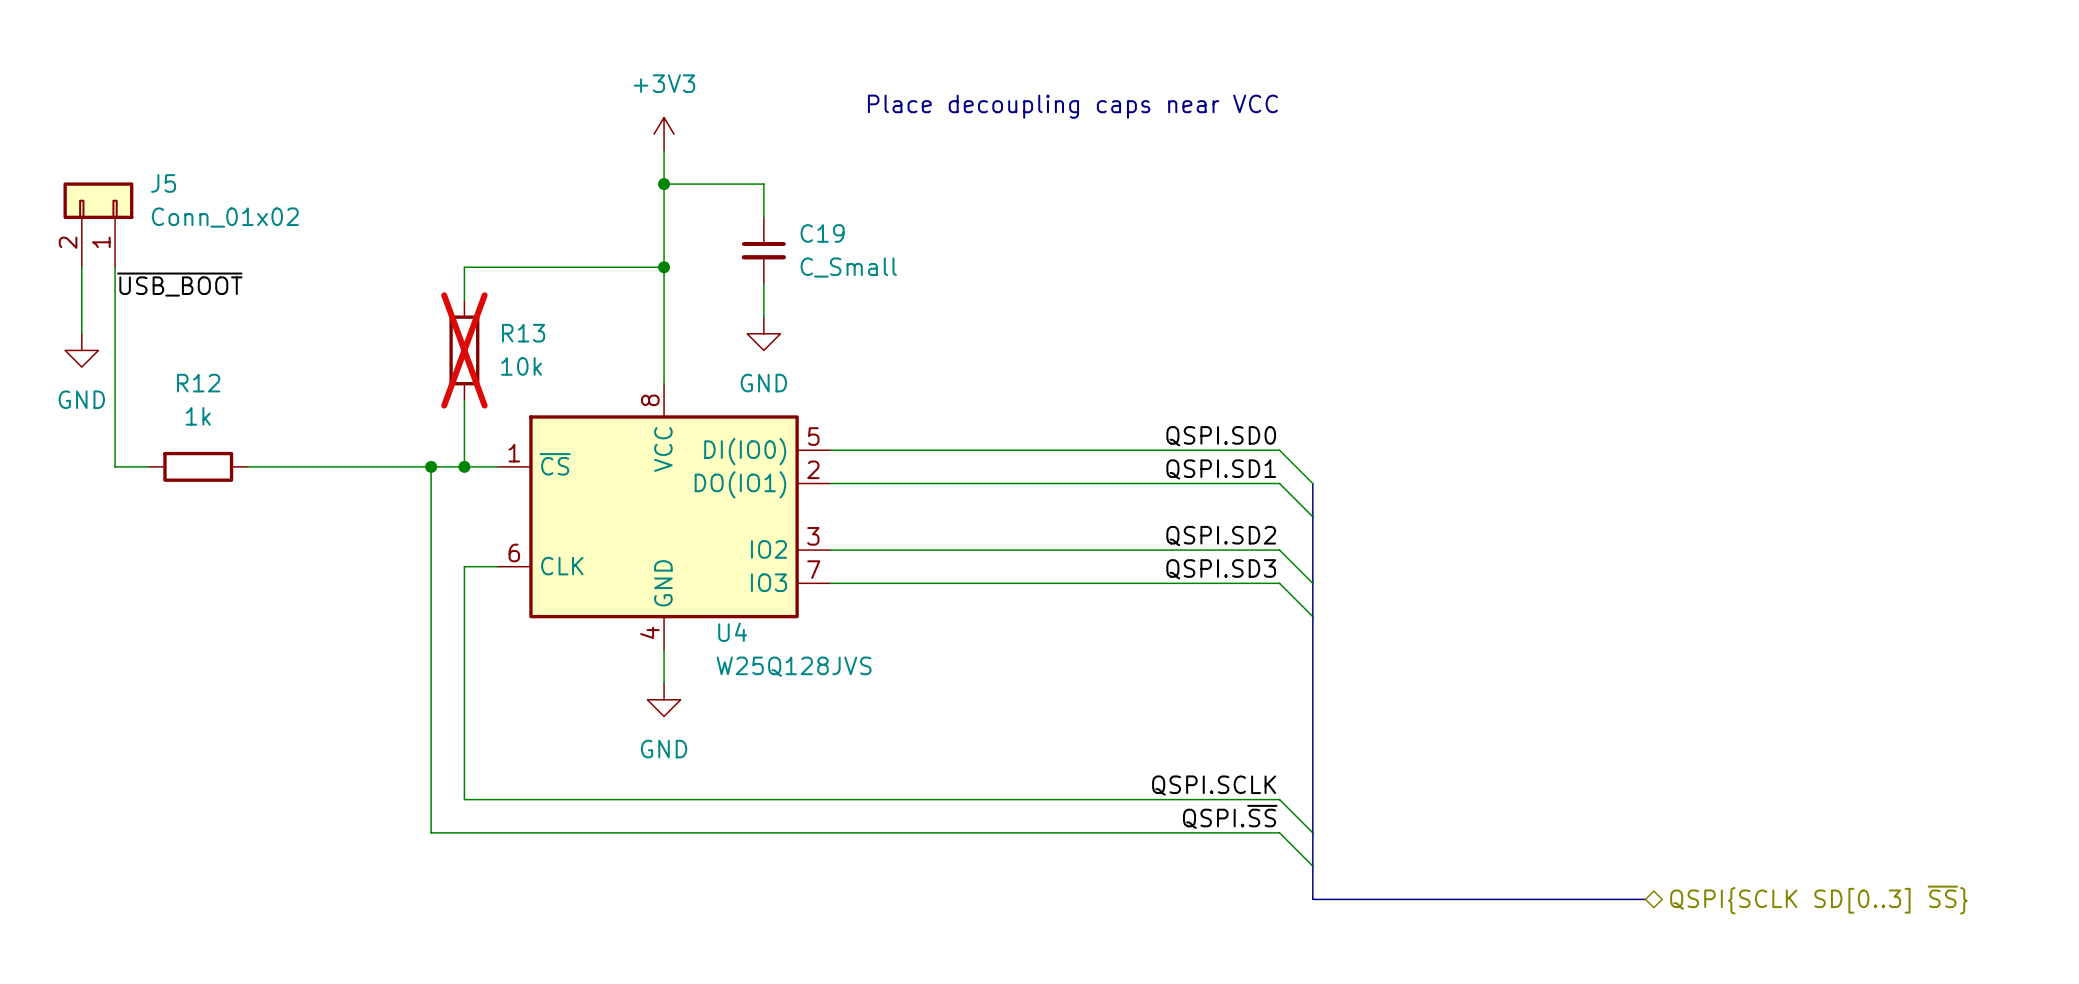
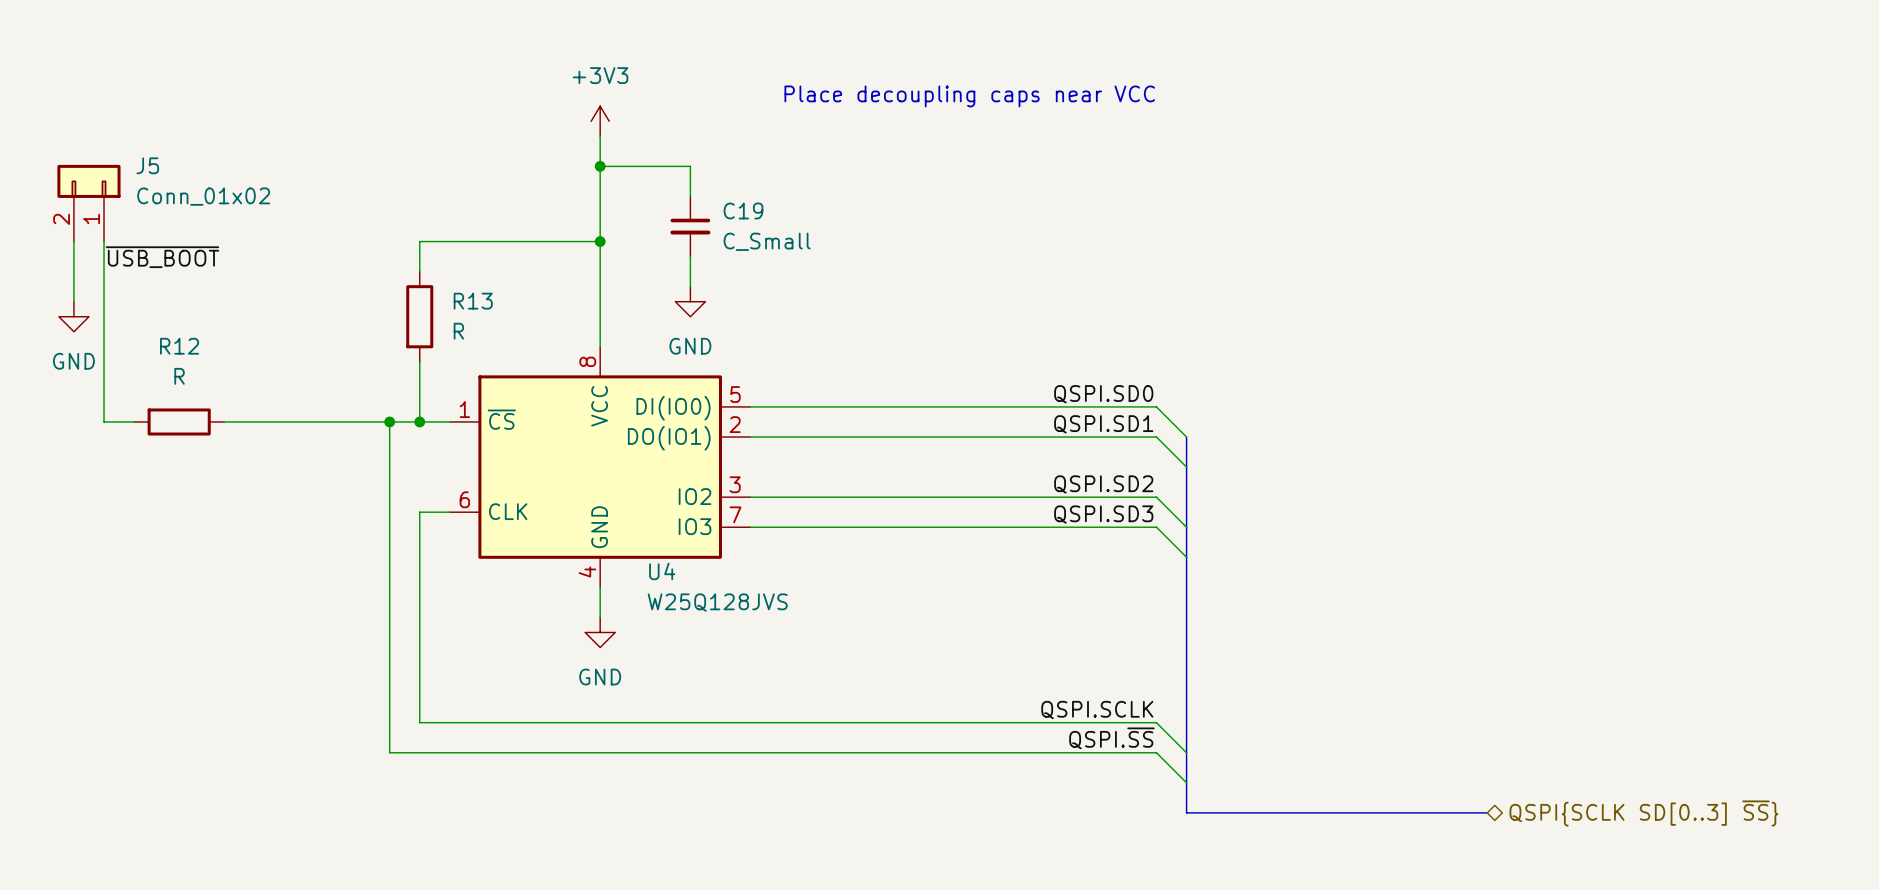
R13 do-not-place cross: (464, 350) -> none
R13 value: 10k (521, 366) -> R (458, 331)
R12 value: 1k (198, 416) -> R (179, 376)

